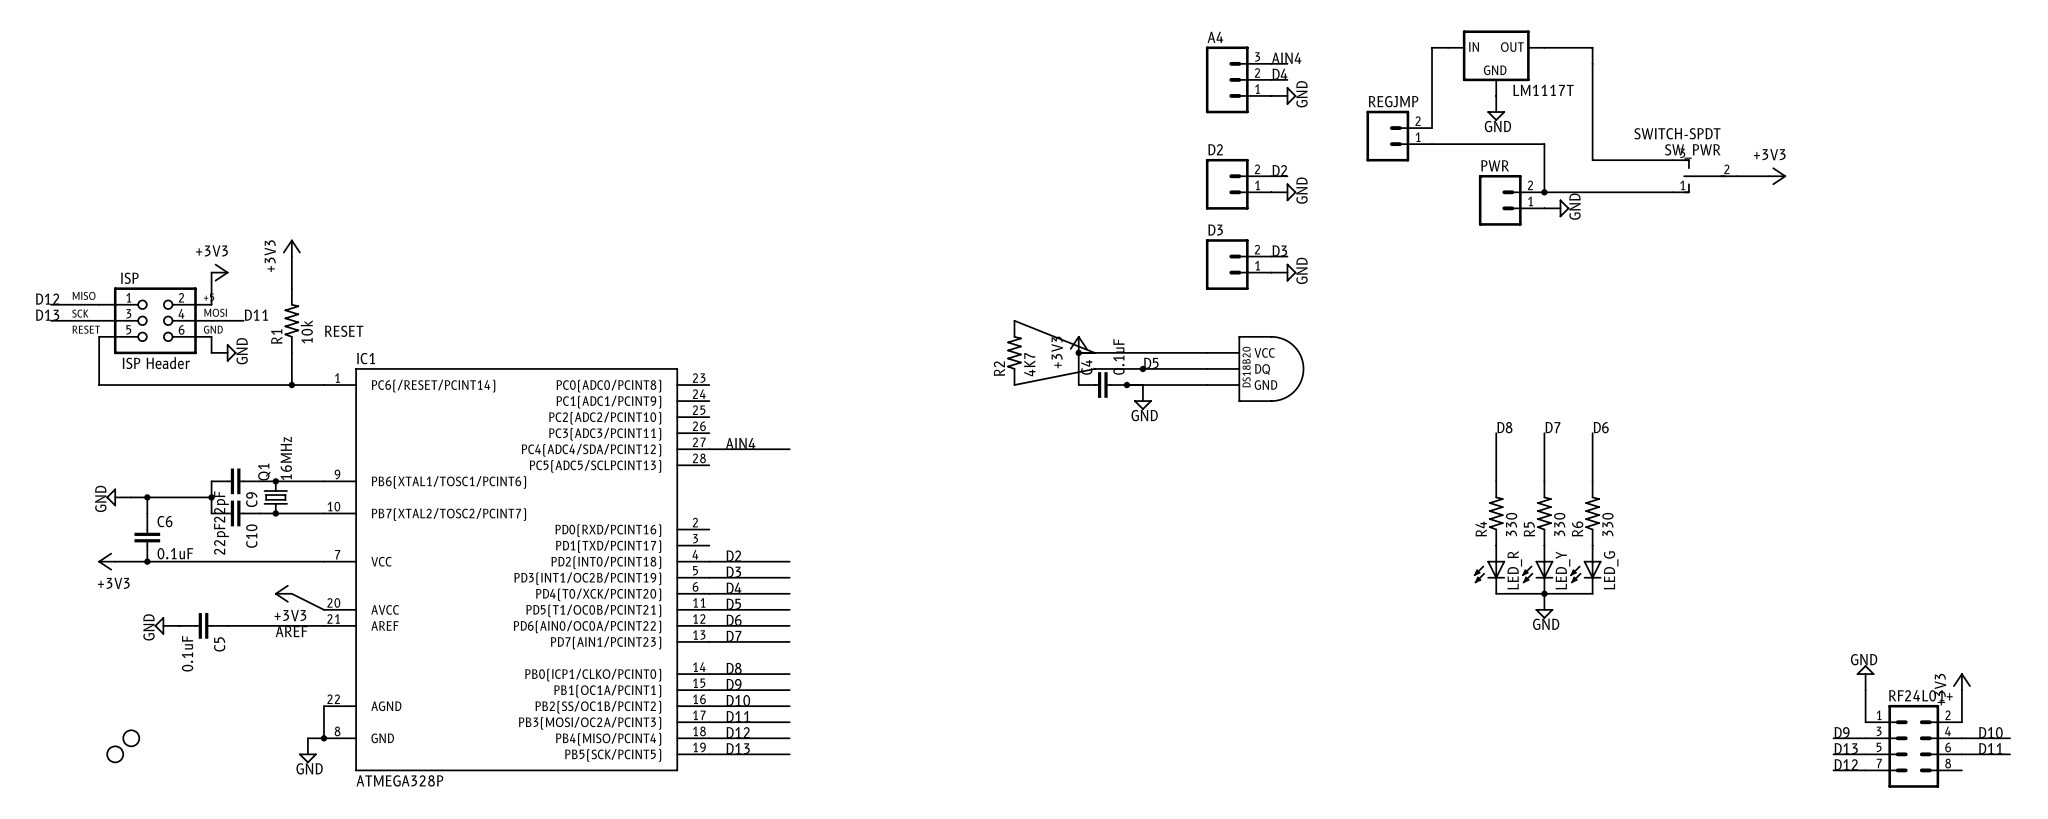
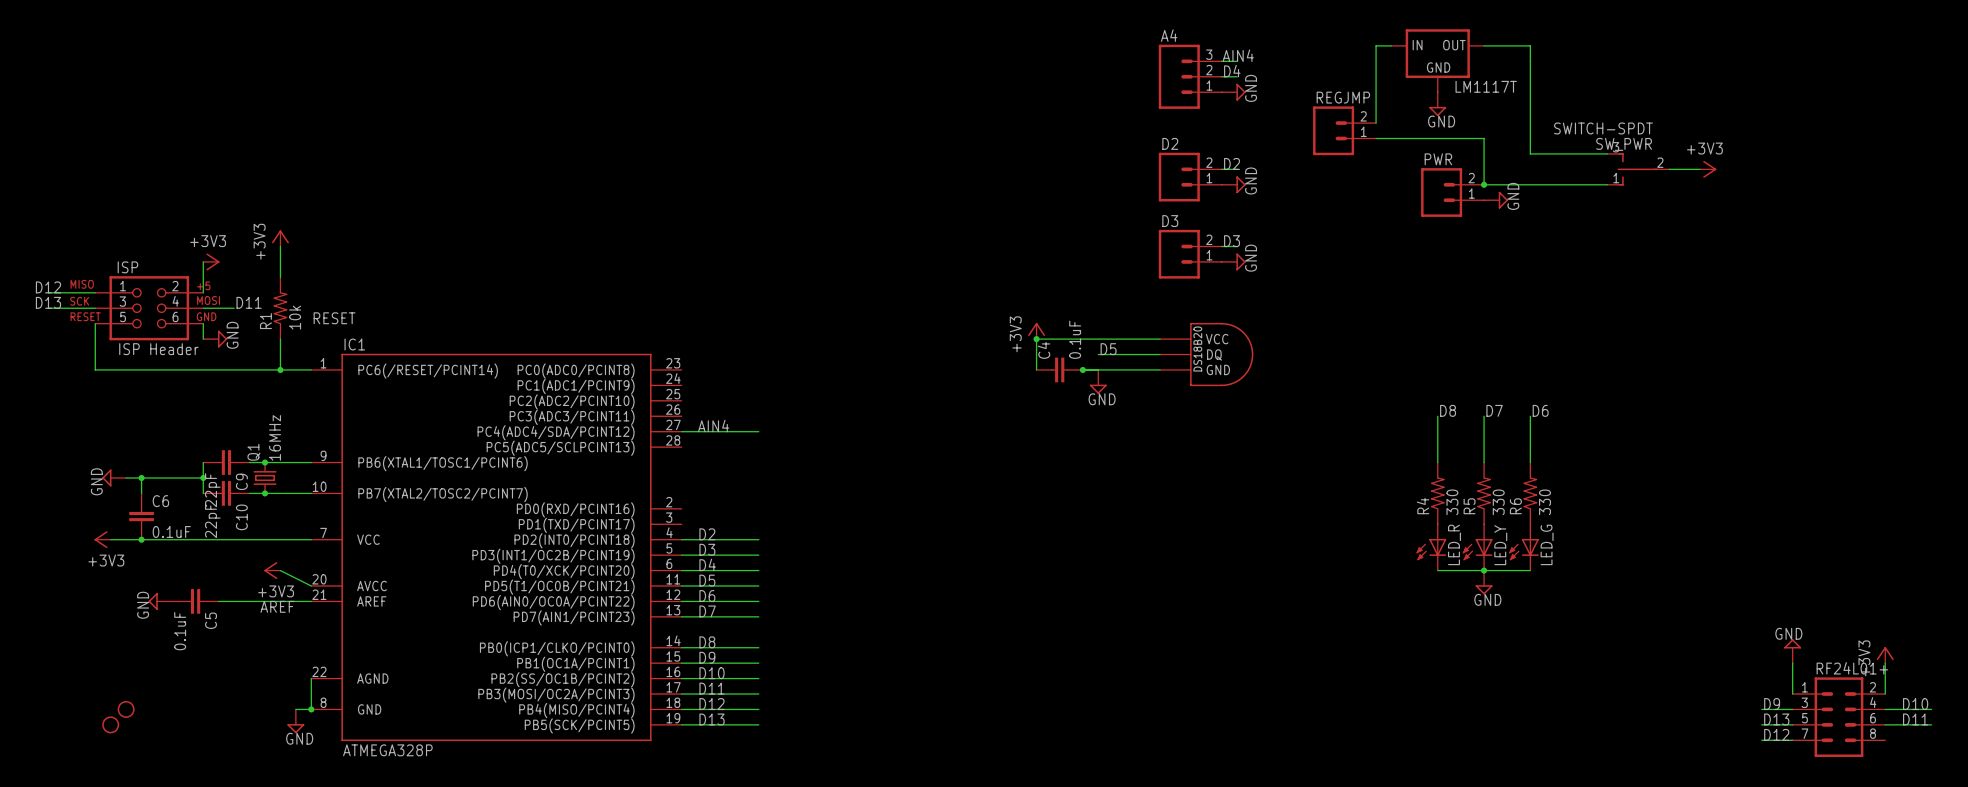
wire: (1014, 320) (1094, 352) -> none
R2: 4K7 (1014, 352) -> none
wire: (1142, 368) (1094, 368) (1014, 385) -> none
junction: (1142, 368) -> none

